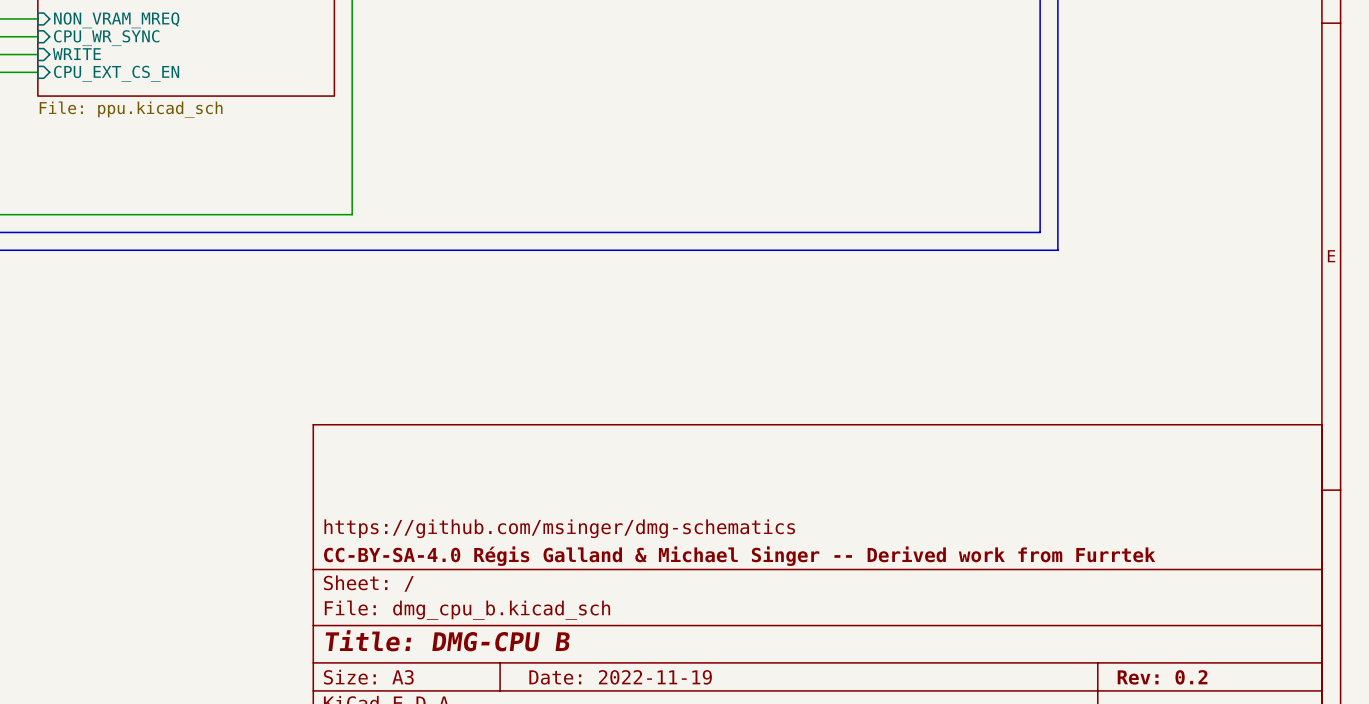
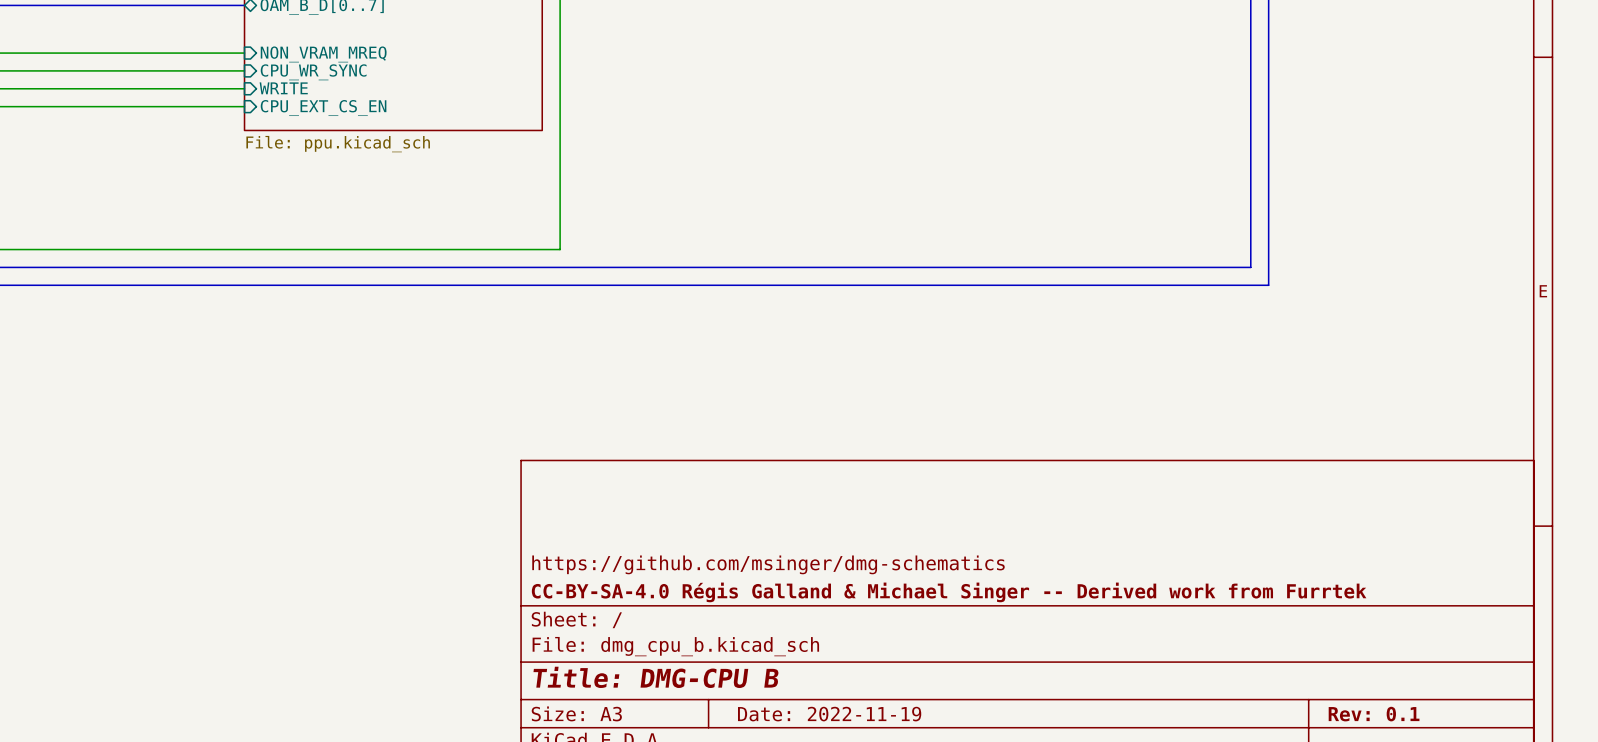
title block: Rev: 0.2 (1162, 677) -> Rev: 0.1 (1374, 714)

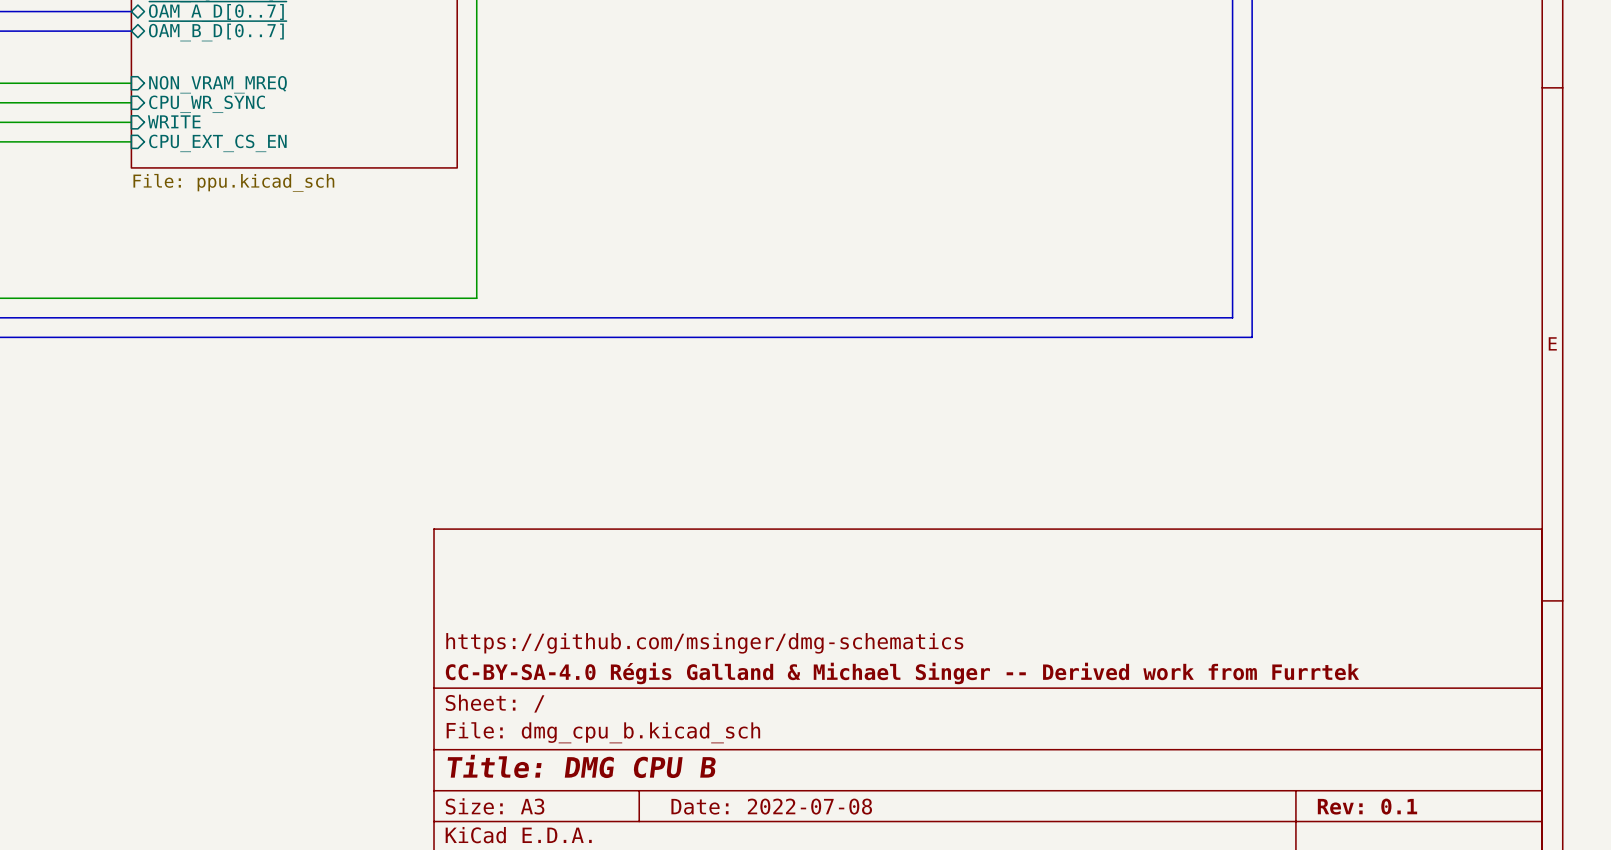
title block: Title: DMG-CPU B (656, 677) -> Title: DMG CPU B (581, 766)
title block: Date: 2022-11-19 (829, 714) -> Date: 2022-07-08 (771, 806)

